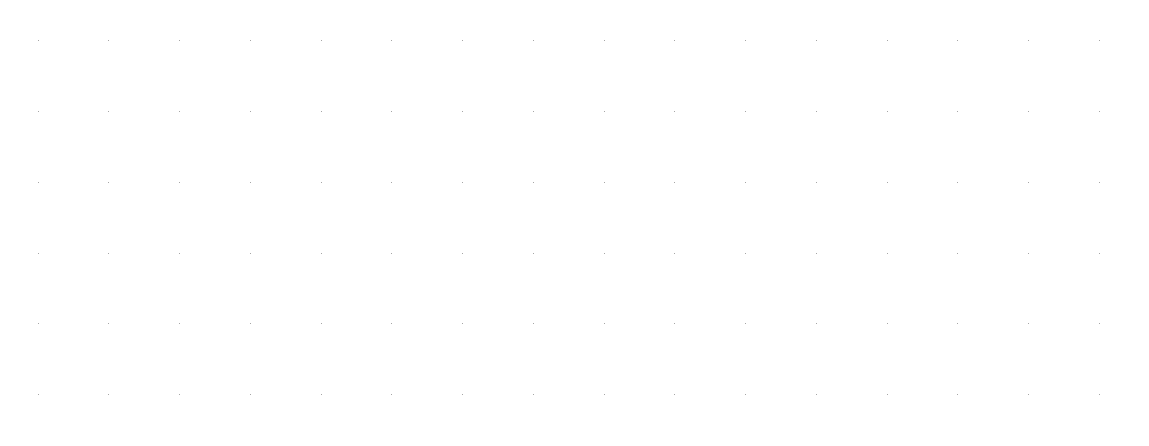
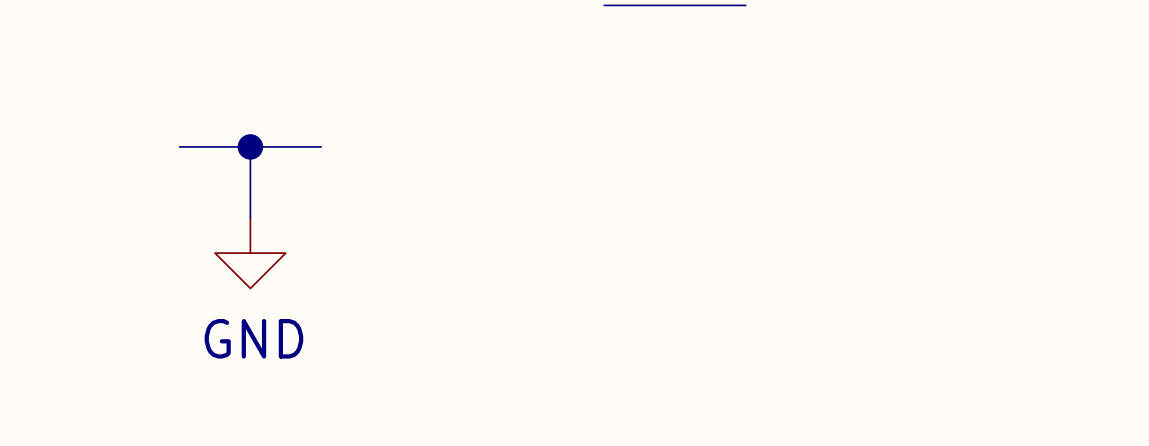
wire: none -> (604, 5) (745, 5)
wire: none -> (179, 146) (321, 146)
wire: none -> (250, 146) (250, 217)
junction: none -> (250, 146)
power symbol: none -> GND (250, 253)

